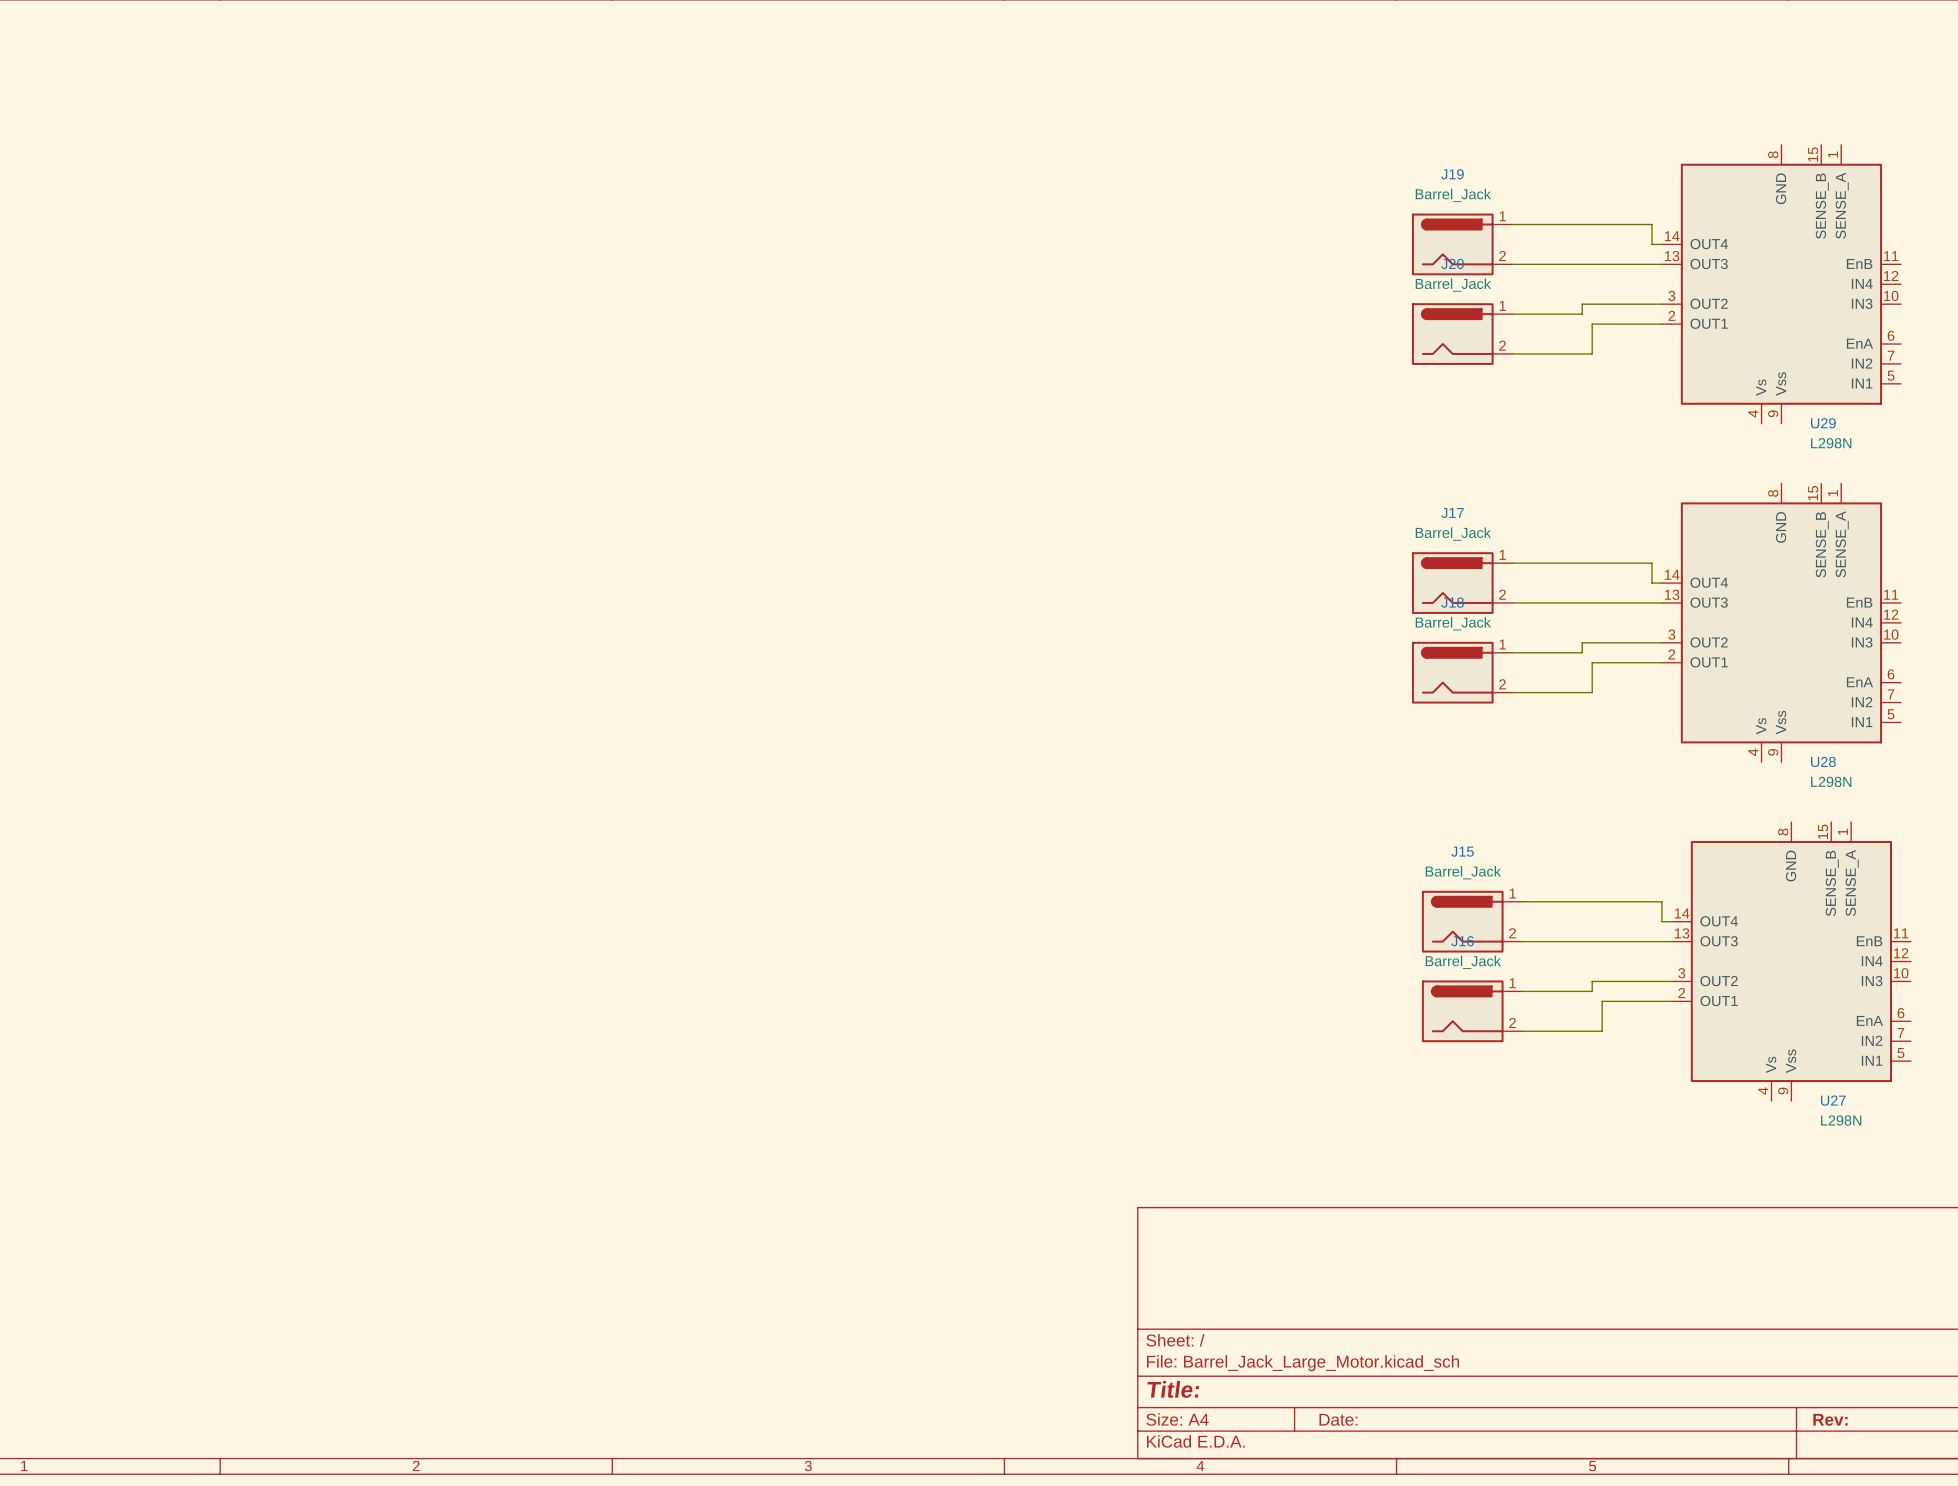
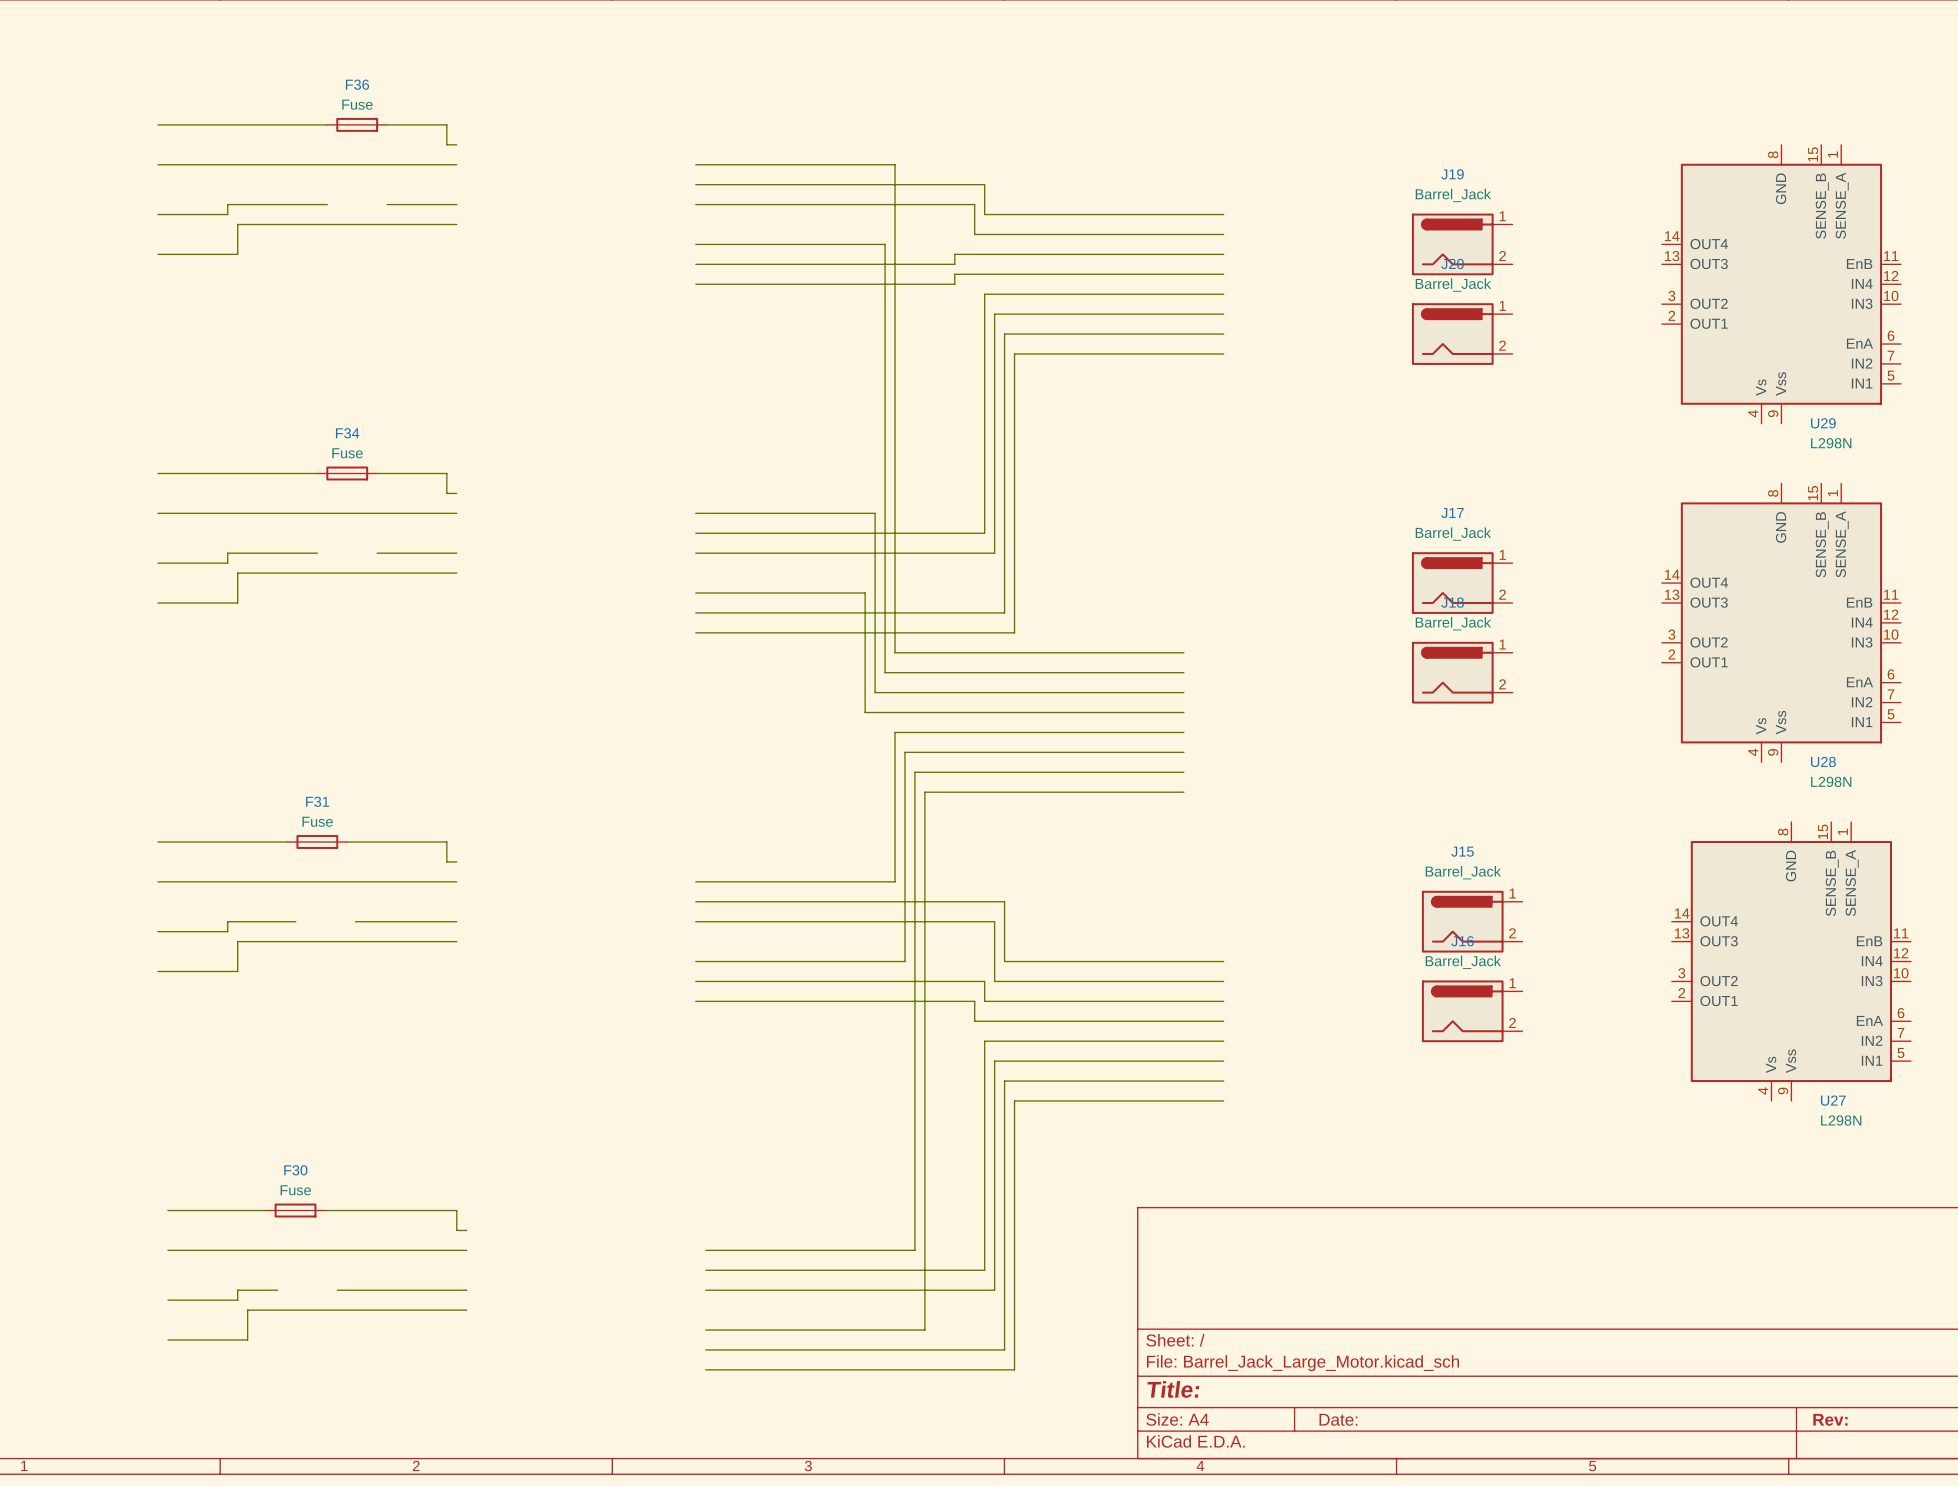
wire: none -> (158, 124) (327, 124)
F36: none -> Fuse (357, 124)
wire: none -> (387, 124) (446, 124) (446, 144) (456, 144)
wire: none -> (158, 164) (456, 164)
wire: none -> (695, 164) (895, 164) (895, 652) (1183, 652)
wire: none -> (695, 184) (984, 184) (984, 214) (1223, 214)
wire: none -> (327, 204) (227, 204) (227, 214) (158, 214)
wire: none -> (387, 204) (456, 204)
wire: none -> (695, 204) (974, 204) (974, 234) (1223, 234)
wire: none -> (456, 224) (237, 224) (237, 254) (158, 254)
wire: (1512, 224) (1651, 224) (1651, 244) (1661, 244) -> none
wire: none -> (695, 244) (885, 244) (885, 672) (1183, 672)
wire: none -> (1223, 254) (954, 254) (954, 264) (695, 264)
wire: (1512, 264) (1661, 264) -> none
wire: none -> (1223, 274) (954, 274) (954, 284) (695, 284)
wire: none -> (1223, 294) (984, 294) (984, 533) (695, 533)
wire: (1661, 304) (1582, 304) (1582, 314) (1512, 314) -> none
wire: none -> (1223, 314) (994, 314) (994, 553) (695, 553)
wire: (1661, 324) (1592, 324) (1592, 353) (1512, 353) -> none
wire: none -> (1223, 334) (1004, 334) (1004, 612) (695, 612)
wire: none -> (1223, 353) (1014, 353) (1014, 632) (695, 632)
wire: none -> (158, 473) (317, 473)
F34: none -> Fuse (347, 473)
wire: none -> (377, 473) (446, 473) (446, 493) (456, 493)
wire: none -> (158, 513) (456, 513)
wire: none -> (695, 513) (875, 513) (875, 692) (1183, 692)
wire: none -> (317, 553) (227, 553) (227, 563) (158, 563)
wire: none -> (377, 553) (456, 553)
wire: (1512, 563) (1651, 563) (1651, 583) (1661, 583) -> none
wire: none -> (456, 573) (237, 573) (237, 602) (158, 602)
wire: none -> (695, 593) (865, 593) (865, 712) (1183, 712)
wire: (1512, 602) (1661, 602) -> none
wire: (1661, 642) (1582, 642) (1582, 652) (1512, 652) -> none
wire: (1661, 662) (1592, 662) (1592, 692) (1512, 692) -> none
wire: none -> (1183, 732) (895, 732) (895, 881) (695, 881)
wire: none -> (1183, 752) (904, 752) (904, 961) (695, 961)
wire: none -> (1183, 772) (914, 772) (914, 1250) (705, 1250)
wire: none -> (1183, 792) (924, 792) (924, 1330) (705, 1330)
wire: none -> (158, 842) (287, 842)
F31: none -> Fuse (317, 842)
wire: none -> (347, 842) (446, 842) (446, 861) (456, 861)
wire: none -> (158, 881) (456, 881)
wire: none -> (695, 901) (1004, 901) (1004, 961) (1223, 961)
wire: (1522, 901) (1661, 901) (1661, 921) (1671, 921) -> none
wire: none -> (295, 921) (227, 921) (227, 931) (158, 931)
wire: none -> (355, 921) (456, 921)
wire: none -> (695, 921) (994, 921) (994, 981) (1223, 981)
wire: none -> (456, 941) (237, 941) (237, 971) (158, 971)
wire: (1522, 941) (1671, 941) -> none
wire: none -> (695, 981) (984, 981) (984, 1001) (1223, 1001)
wire: (1671, 981) (1592, 981) (1592, 991) (1522, 991) -> none
wire: none -> (695, 1001) (974, 1001) (974, 1021) (1223, 1021)
wire: (1671, 1001) (1602, 1001) (1602, 1031) (1522, 1031) -> none
wire: none -> (1223, 1041) (984, 1041) (984, 1270) (705, 1270)
wire: none -> (1223, 1061) (994, 1061) (994, 1290) (705, 1290)
wire: none -> (1223, 1081) (1004, 1081) (1004, 1349) (705, 1349)
wire: none -> (1223, 1100) (1014, 1100) (1014, 1369) (705, 1369)
wire: none -> (167, 1210) (265, 1210)
F30: none -> Fuse (295, 1210)
wire: none -> (325, 1210) (456, 1210) (456, 1230) (466, 1230)
wire: none -> (167, 1250) (466, 1250)
wire: none -> (277, 1290) (237, 1290) (237, 1300) (167, 1300)
wire: none -> (337, 1290) (466, 1290)
wire: none -> (466, 1310) (247, 1310) (247, 1340) (167, 1340)

